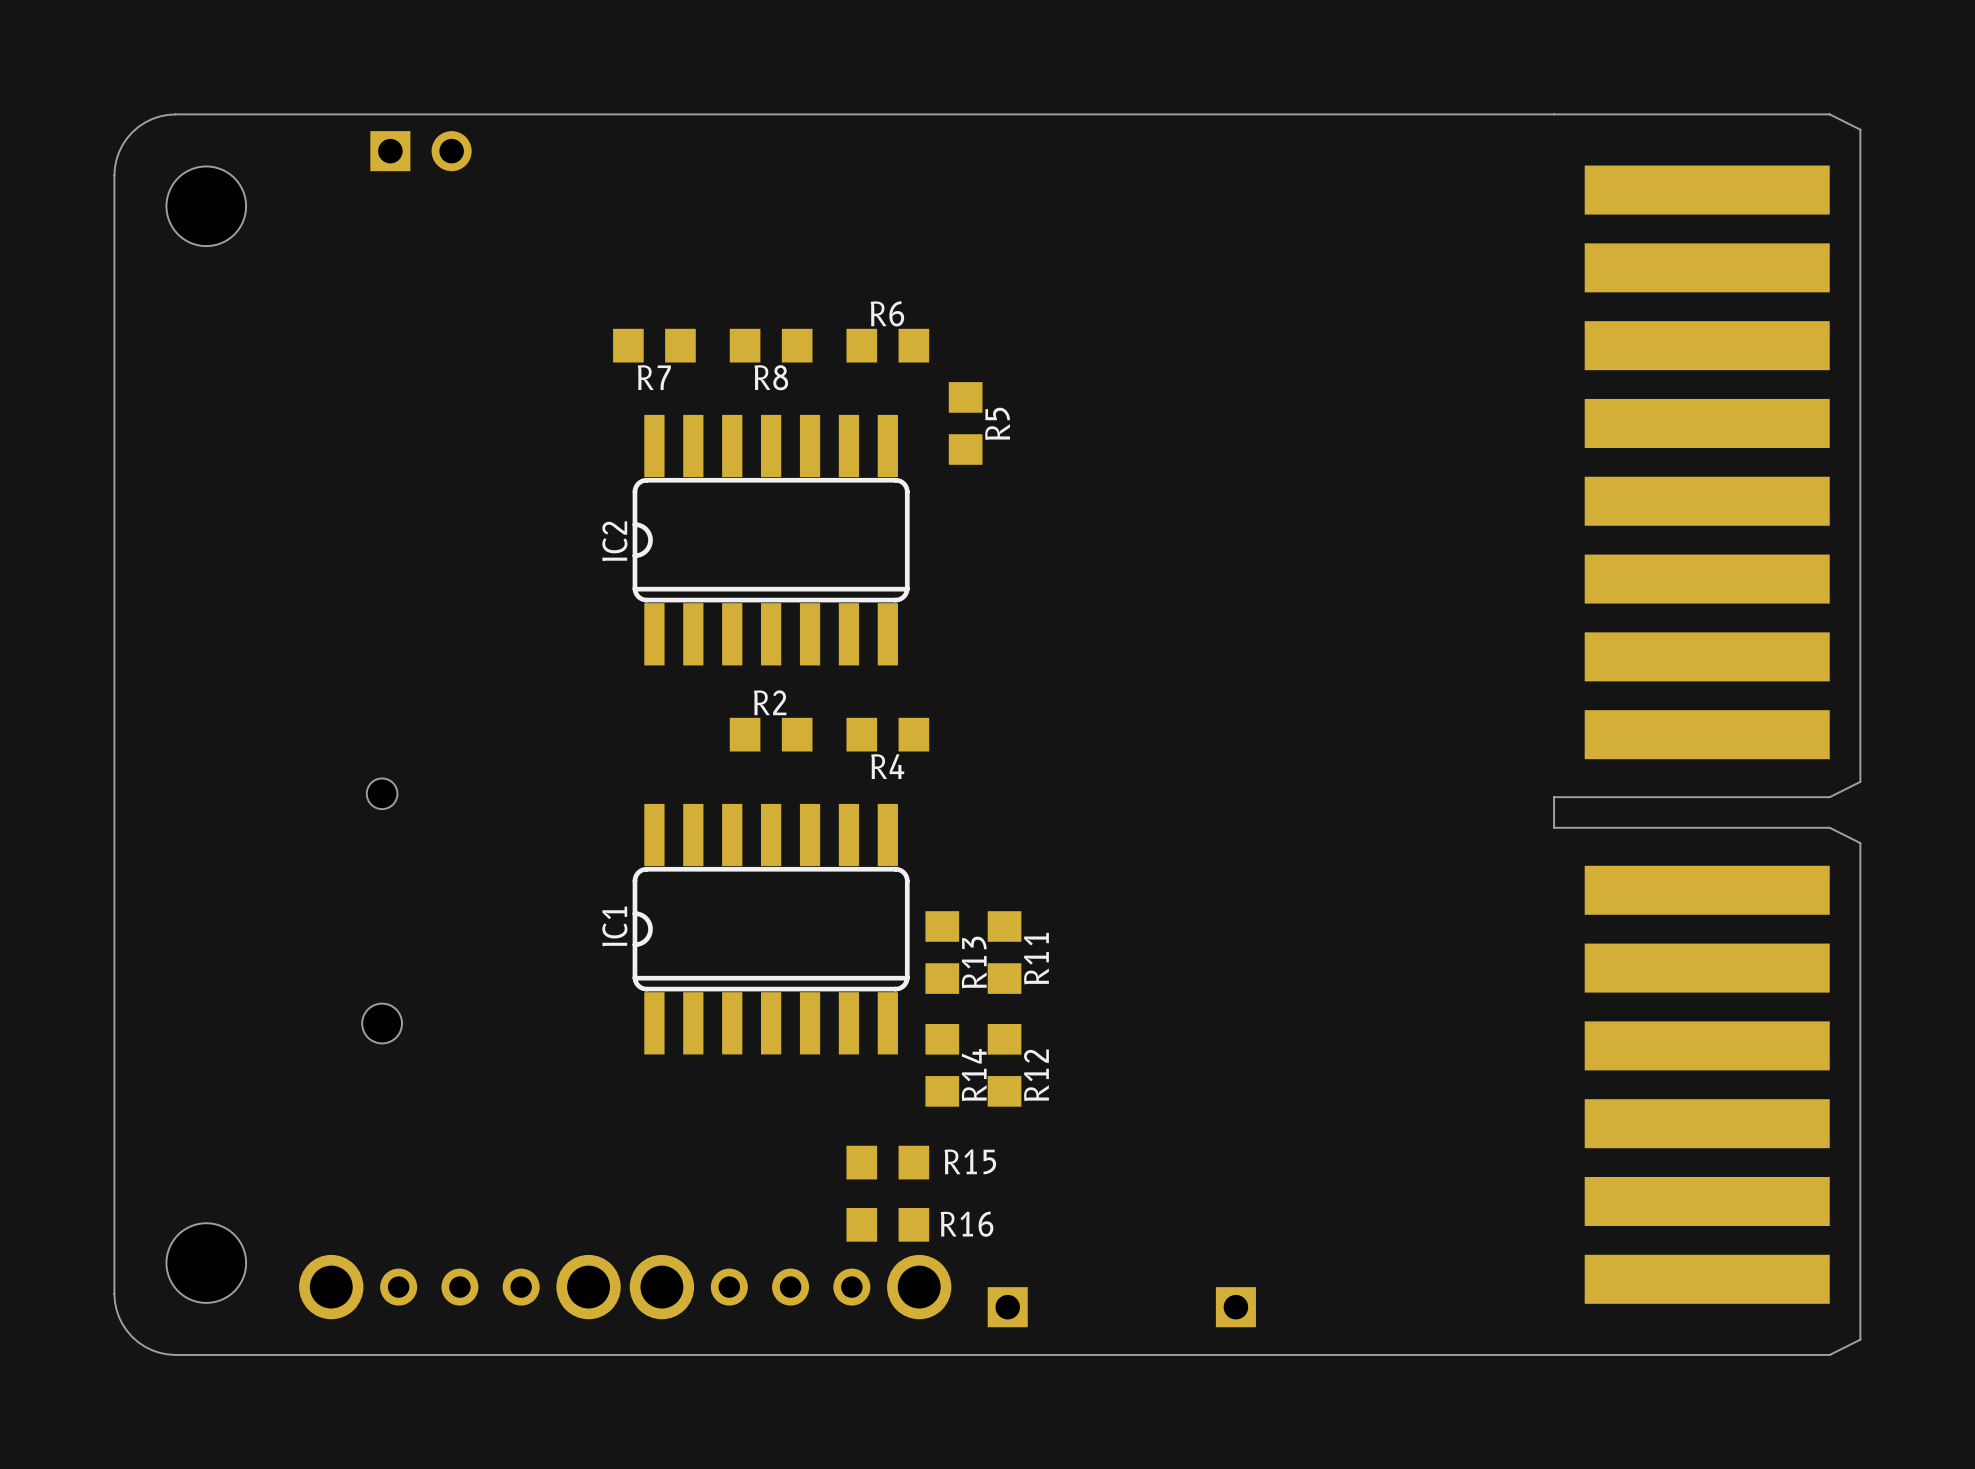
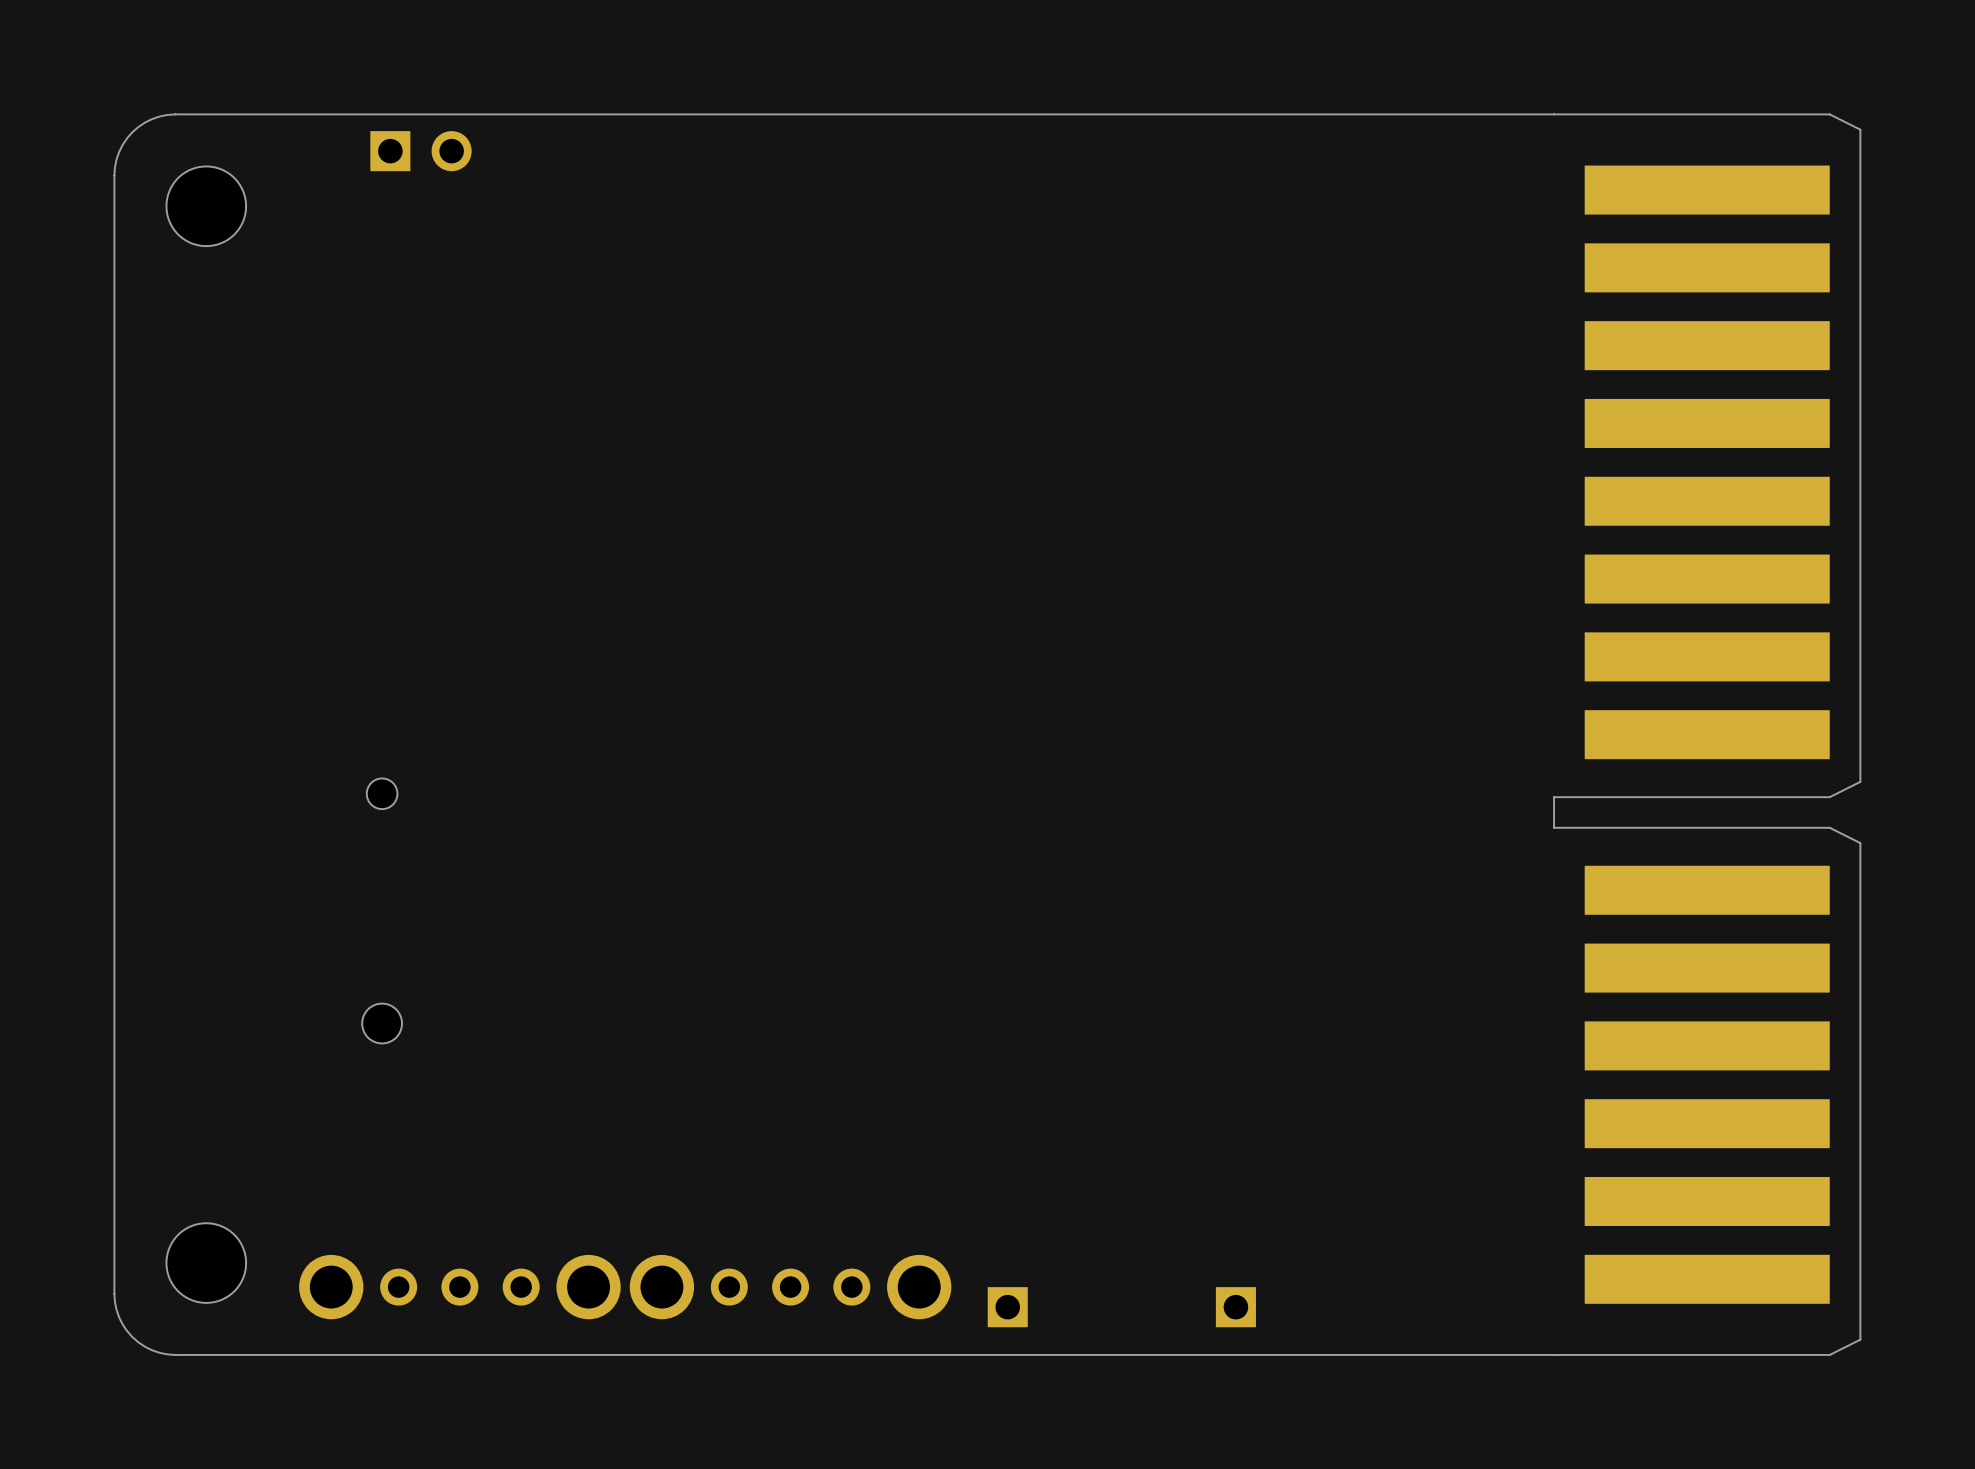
R7: (654, 345) -> none
R8: (771, 345) -> none
R6: (887, 345) -> none
R5: (965, 423) -> none
IC2: (771, 540) -> none
R2: (771, 734) -> none
R4: (887, 734) -> none
IC1: (771, 929) -> none
R13: (942, 952) -> none
R11: (1004, 952) -> none
R14: (942, 1065) -> none
R12: (1004, 1065) -> none
R15: (887, 1162) -> none
R16: (887, 1224) -> none

